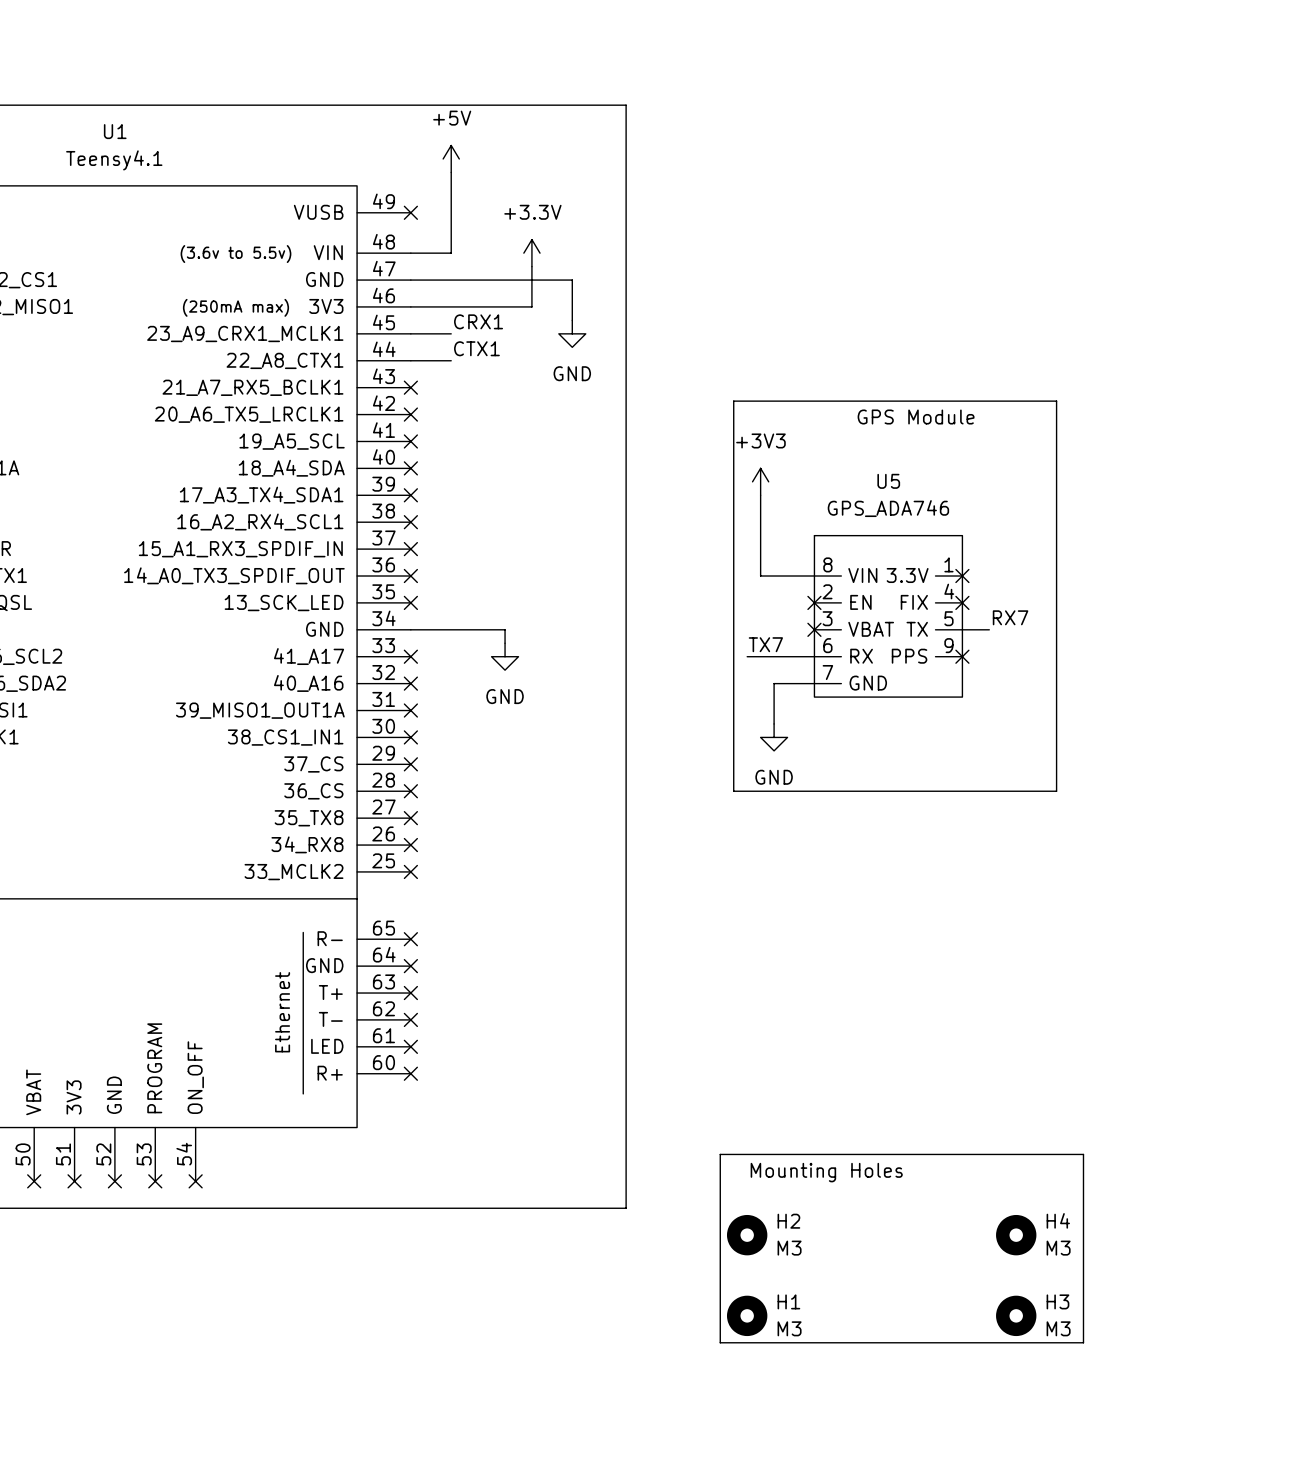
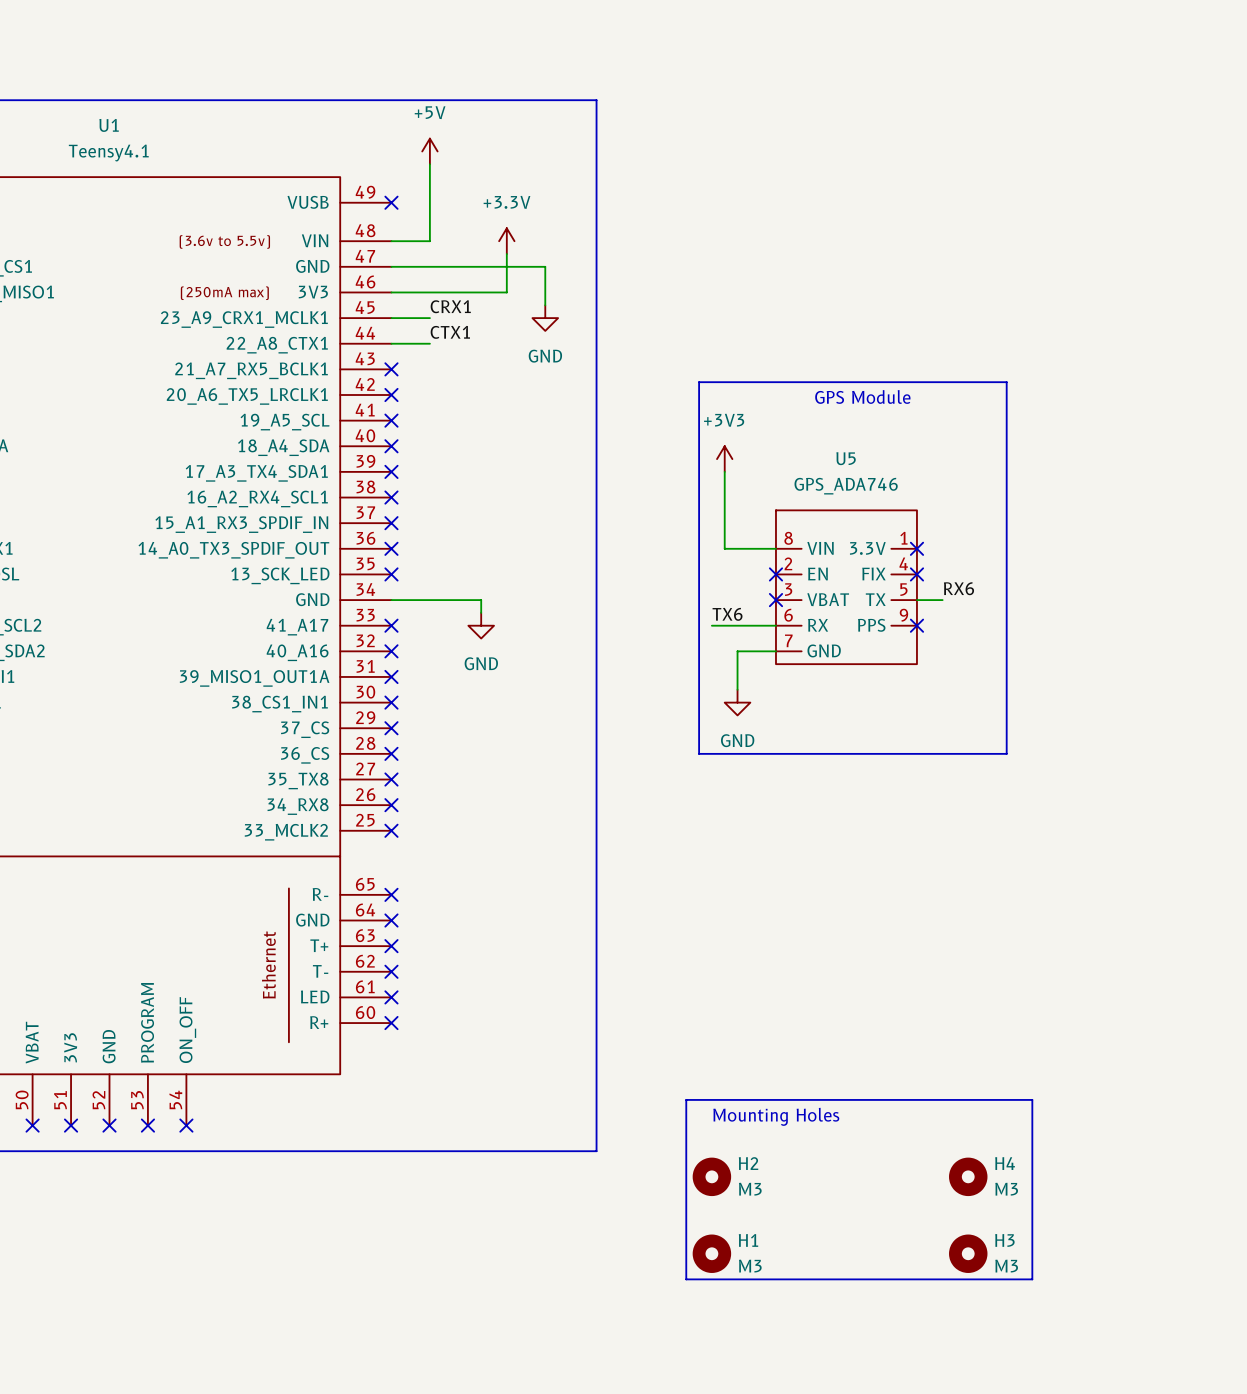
label: RX7 (1010, 617) -> RX6 (958, 588)
label: TX7 (765, 644) -> TX6 (727, 614)

